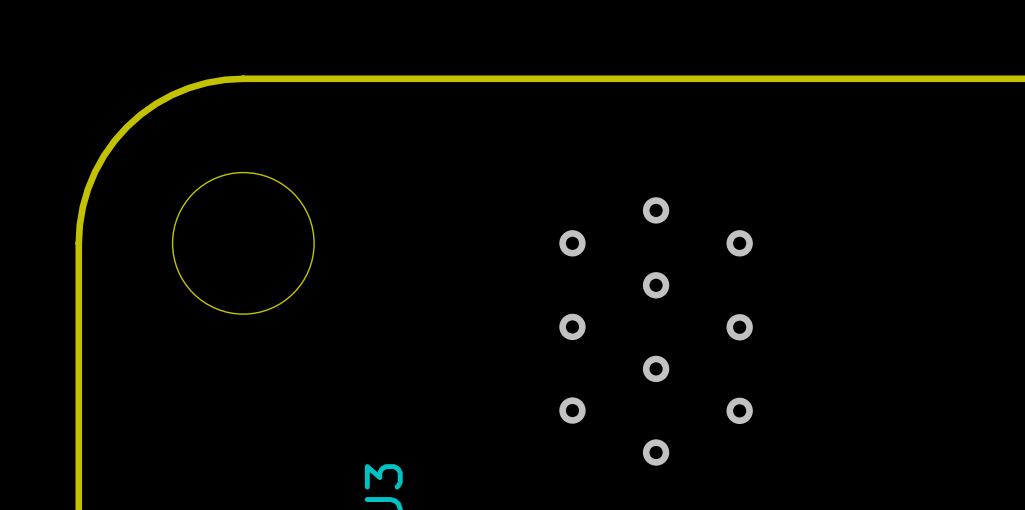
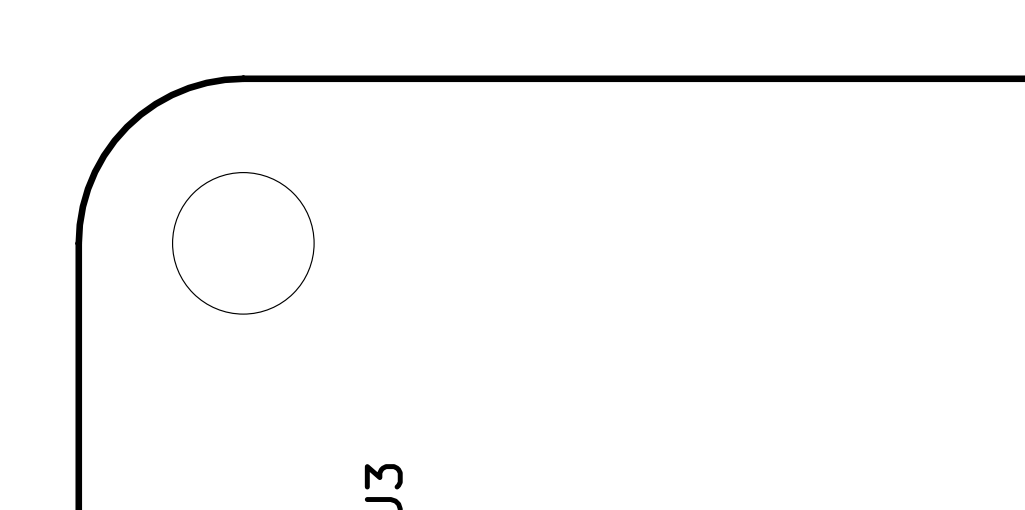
via: (656, 210) -> none
via: (572, 243) -> none
via: (739, 243) -> none
via: (656, 285) -> none
via: (572, 326) -> none
via: (739, 327) -> none
via: (656, 368) -> none
via: (572, 410) -> none
via: (739, 410) -> none
via: (656, 452) -> none

